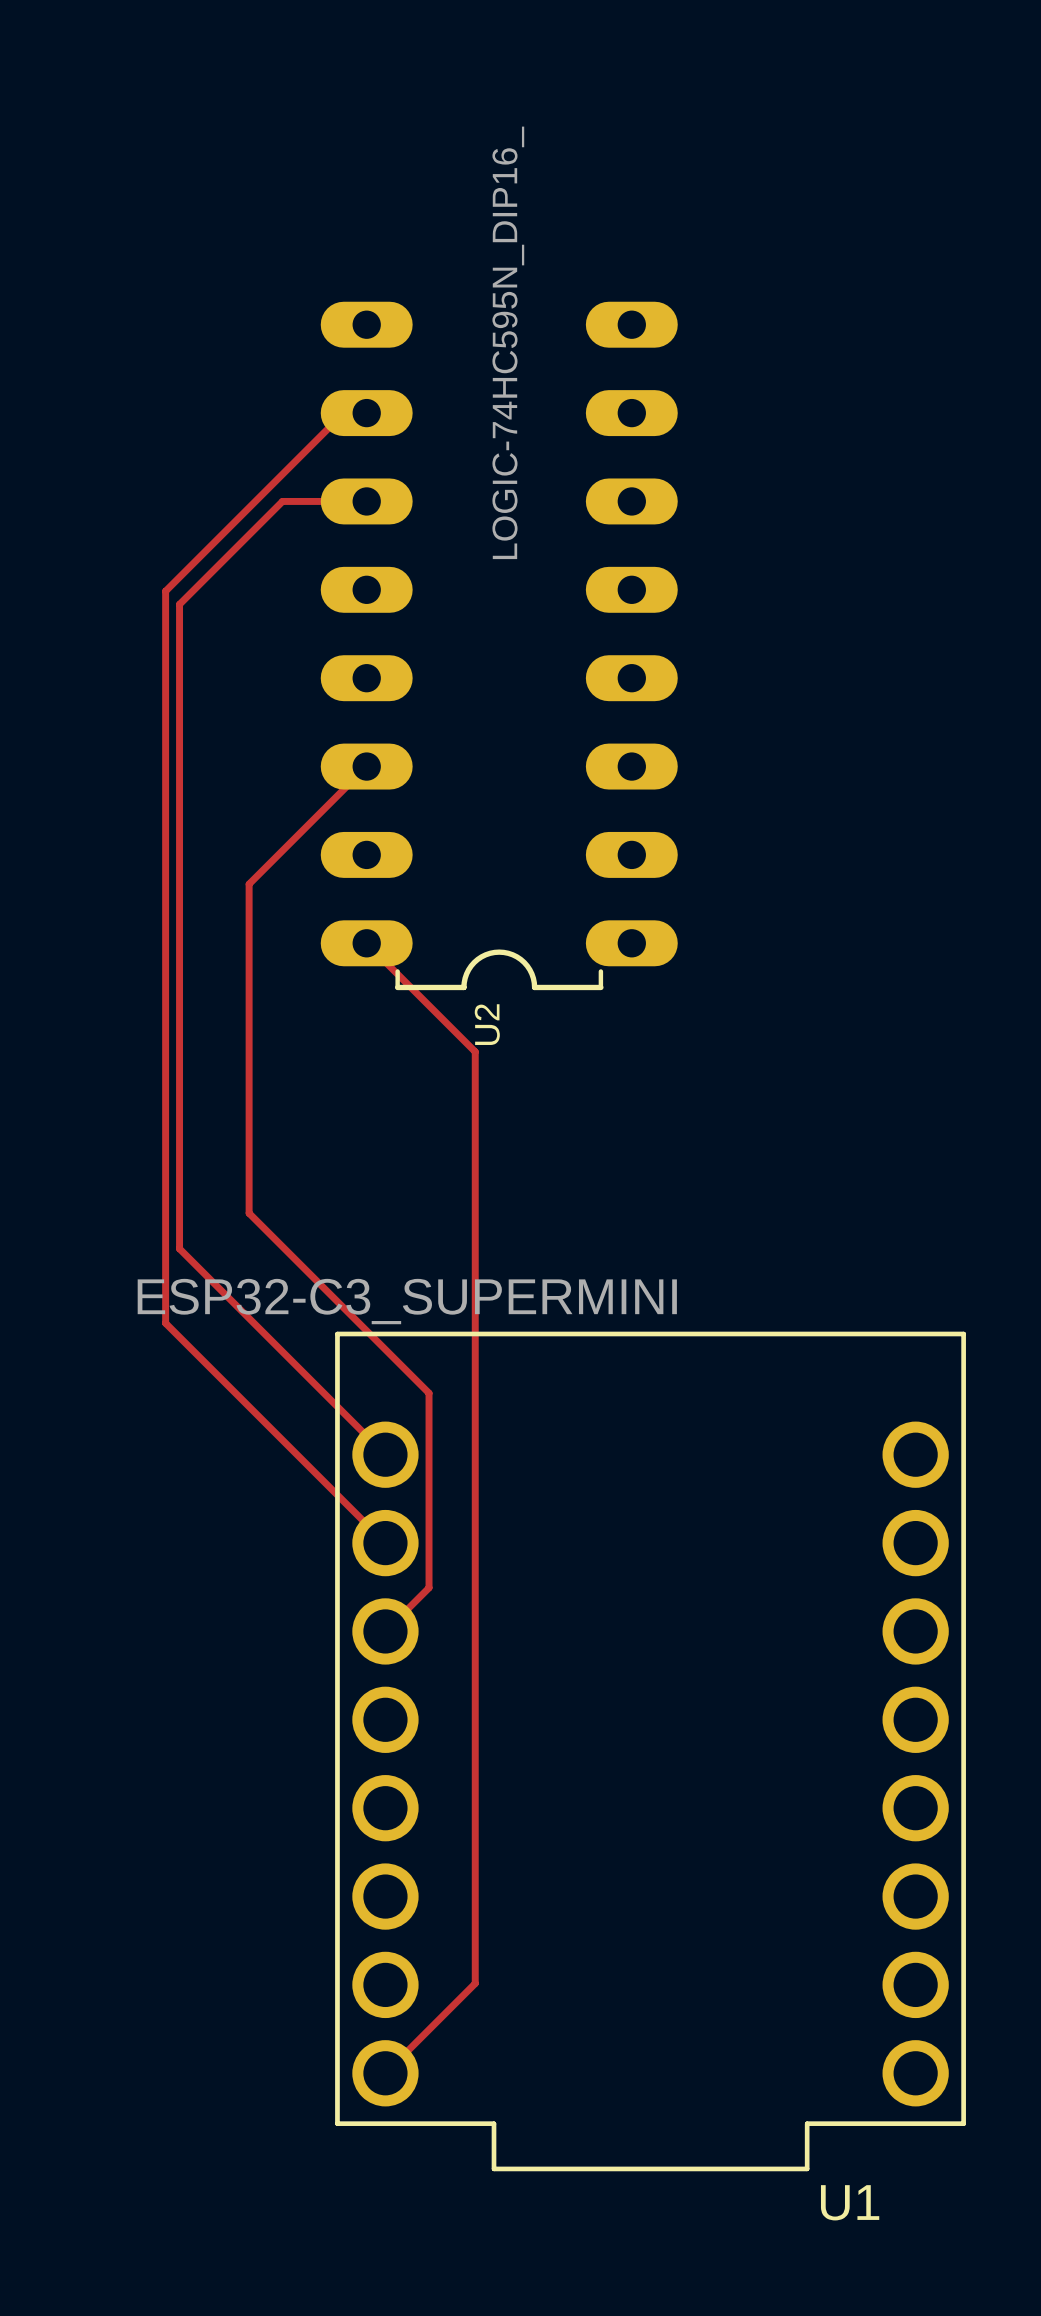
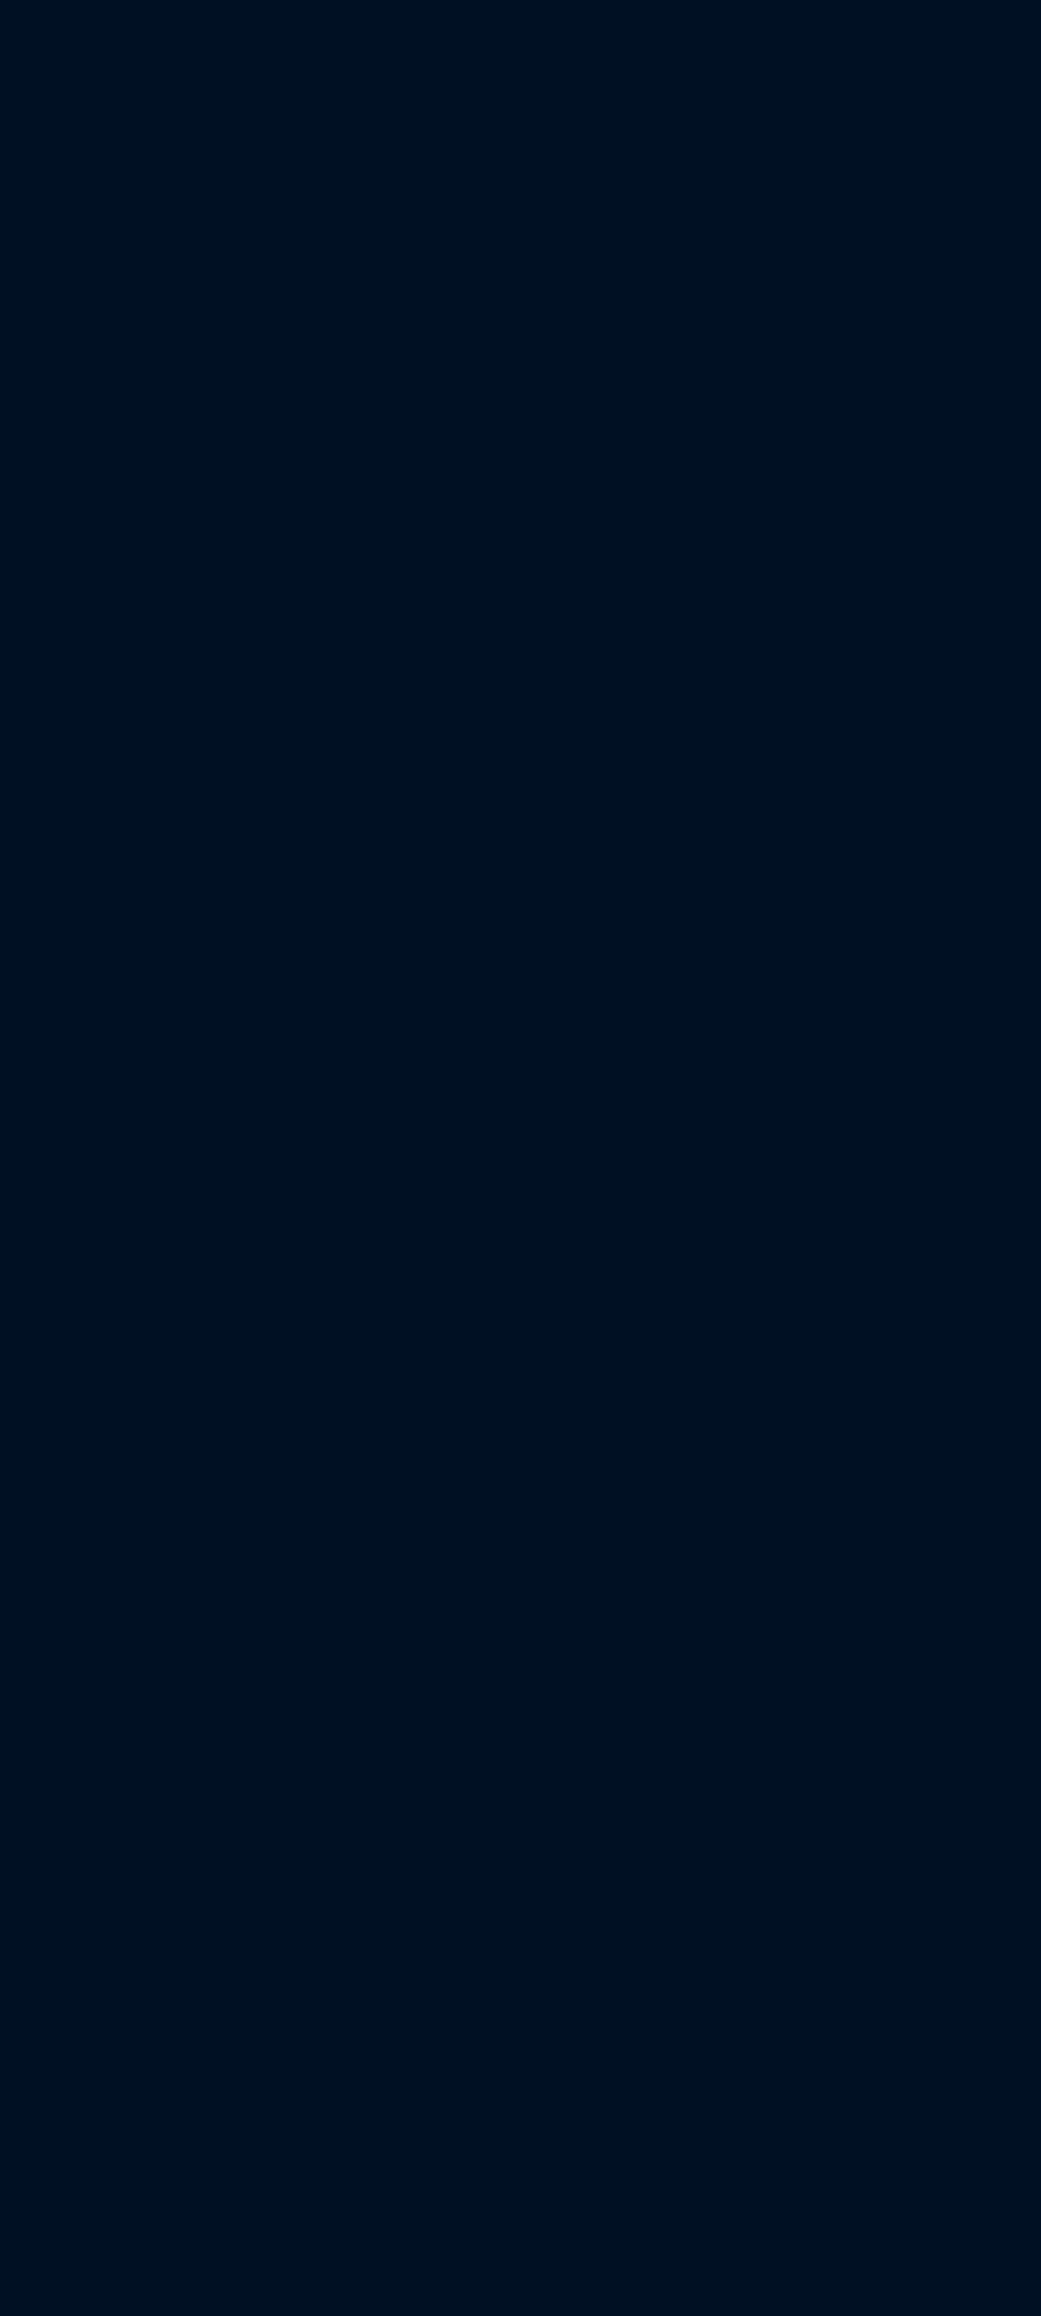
top track: (366, 413) (343, 413) (165, 591) (165, 1323) (385, 1543) -> none
top track: (366, 501) (282, 501) (179, 604) (179, 1248) (385, 1454) -> none
U2: LOGIC-74HC595N_DIP16_ (499, 645) -> none
top track: (366, 766) (249, 884) (249, 1213) (429, 1393) (429, 1587) (385, 1631) -> none
top track: (366, 943) (475, 1051) (475, 1983) (385, 2073) -> none
U1: ESP32-C3_SUPERMINI (650, 1751) -> none

